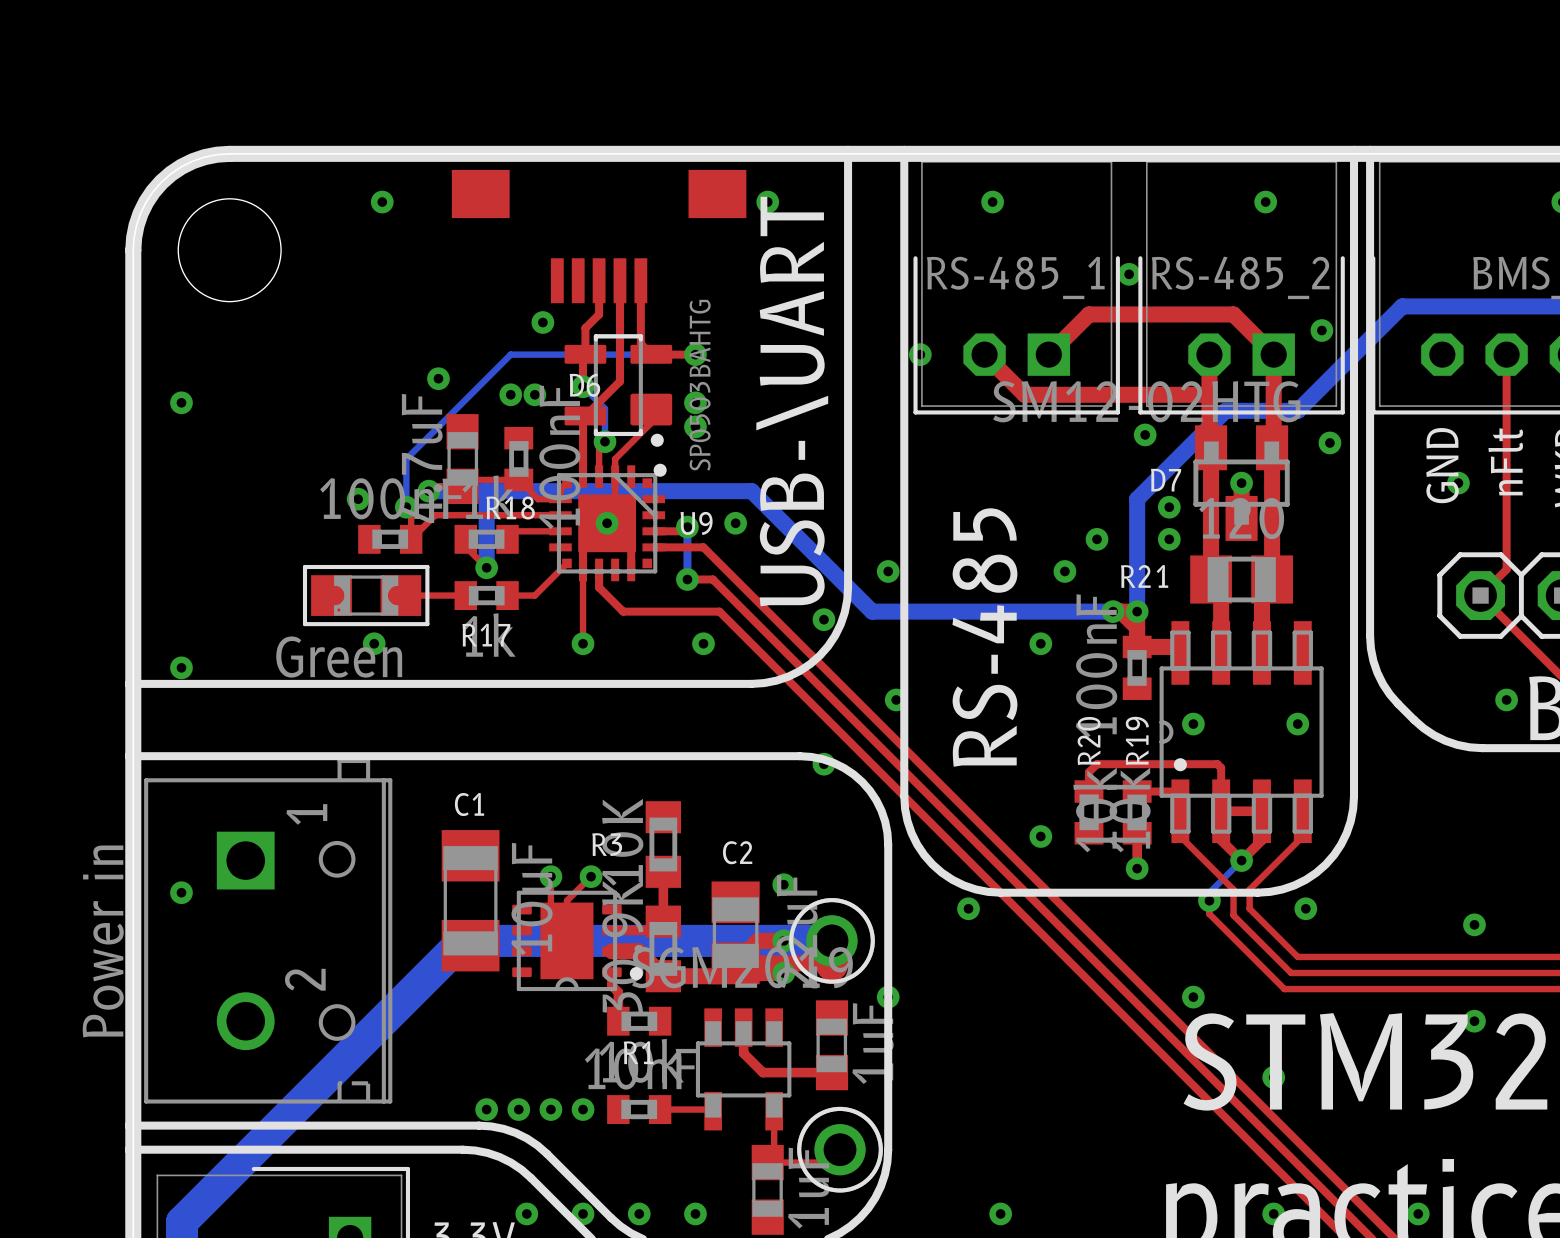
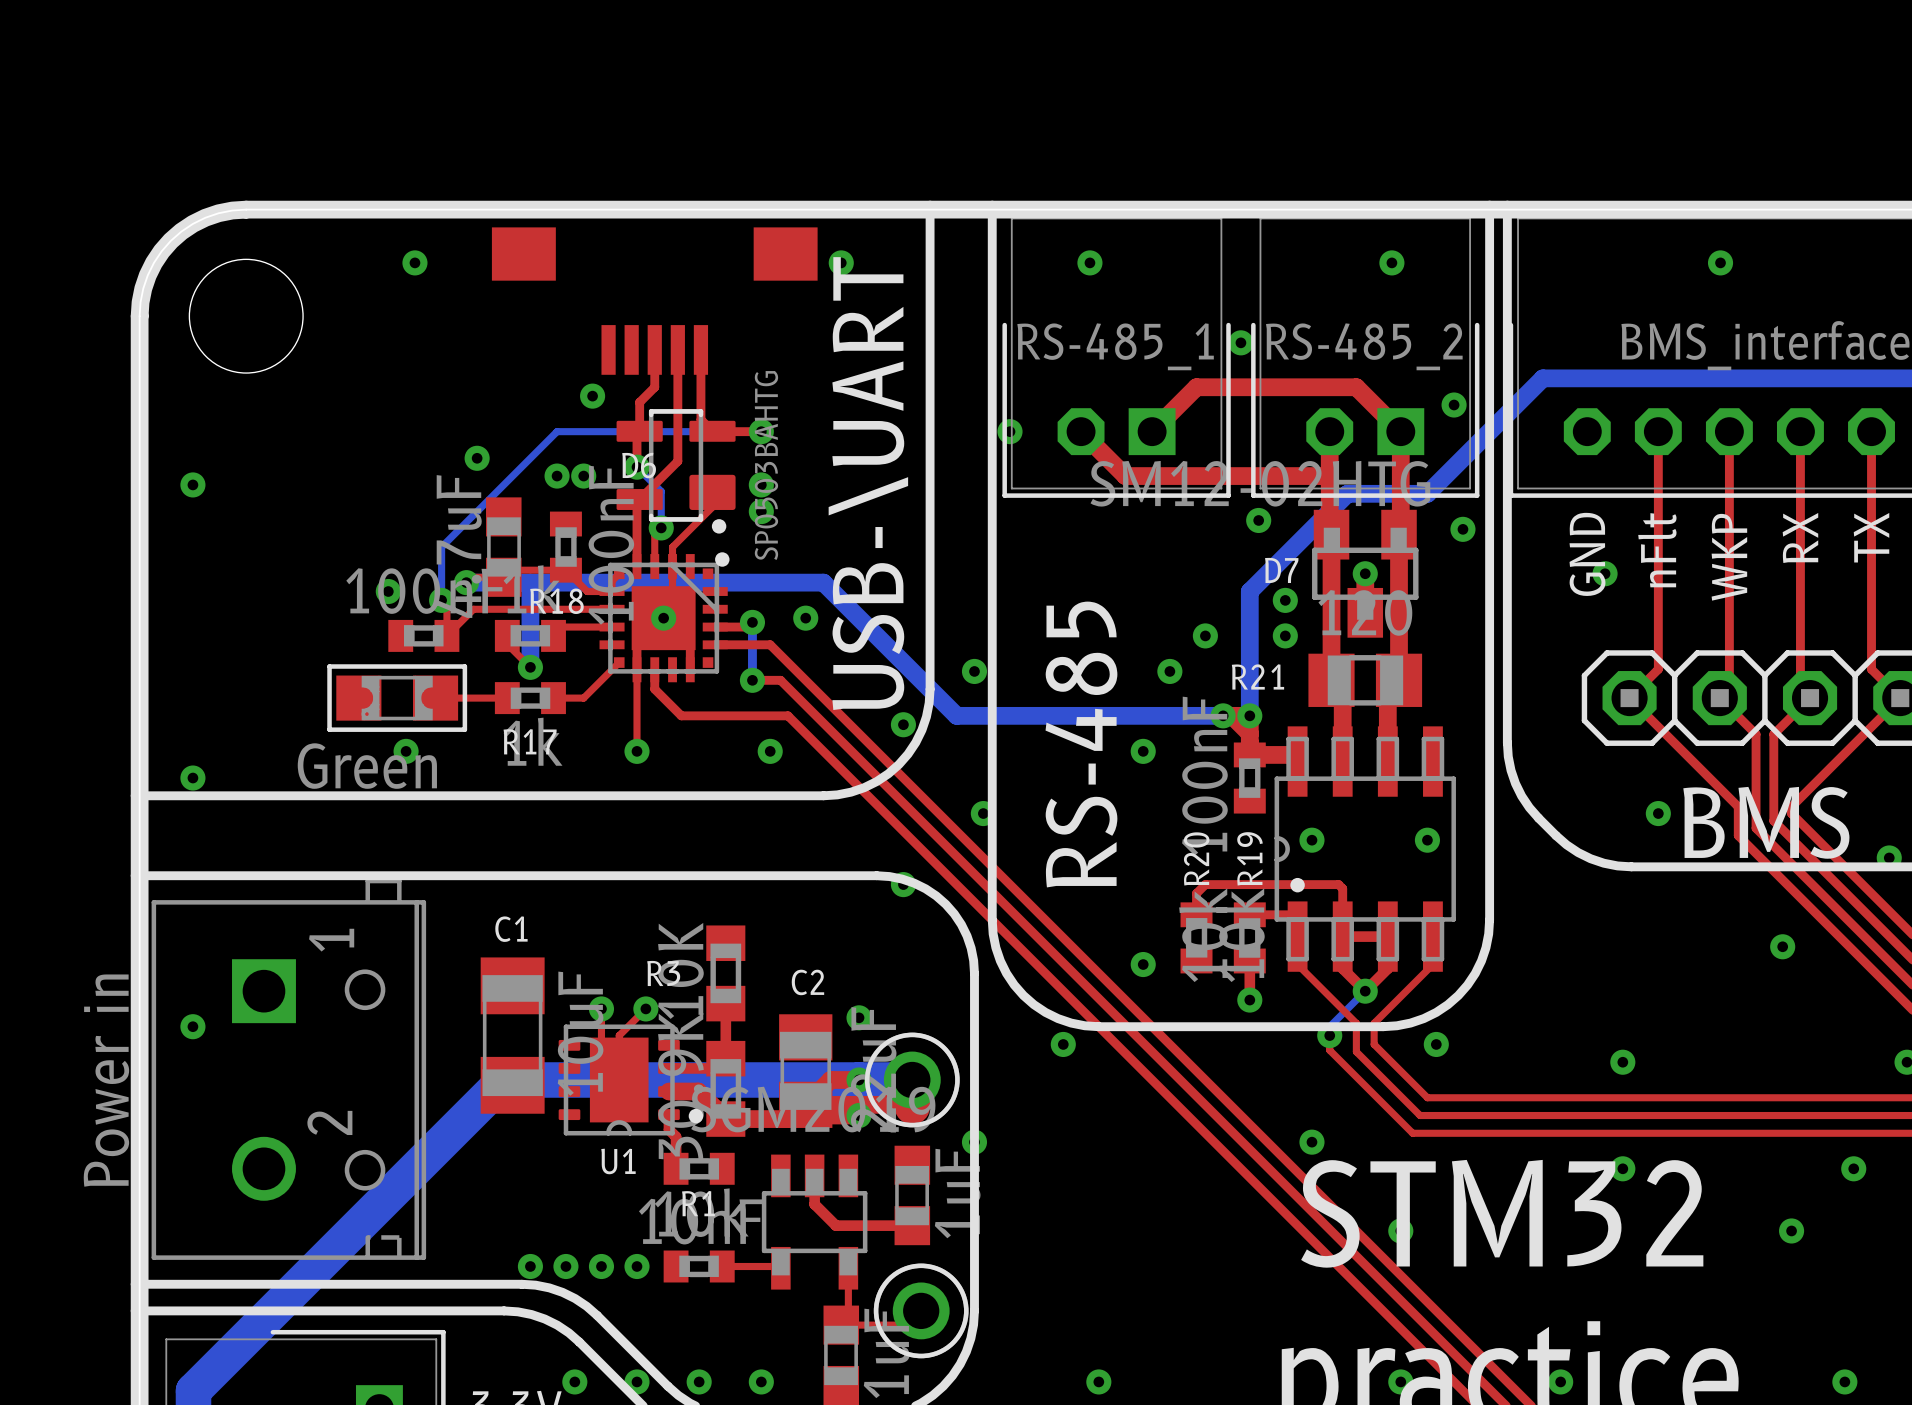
U9 name: U9 (696, 523) -> none
U1 name: none -> U1 (618, 1161)

